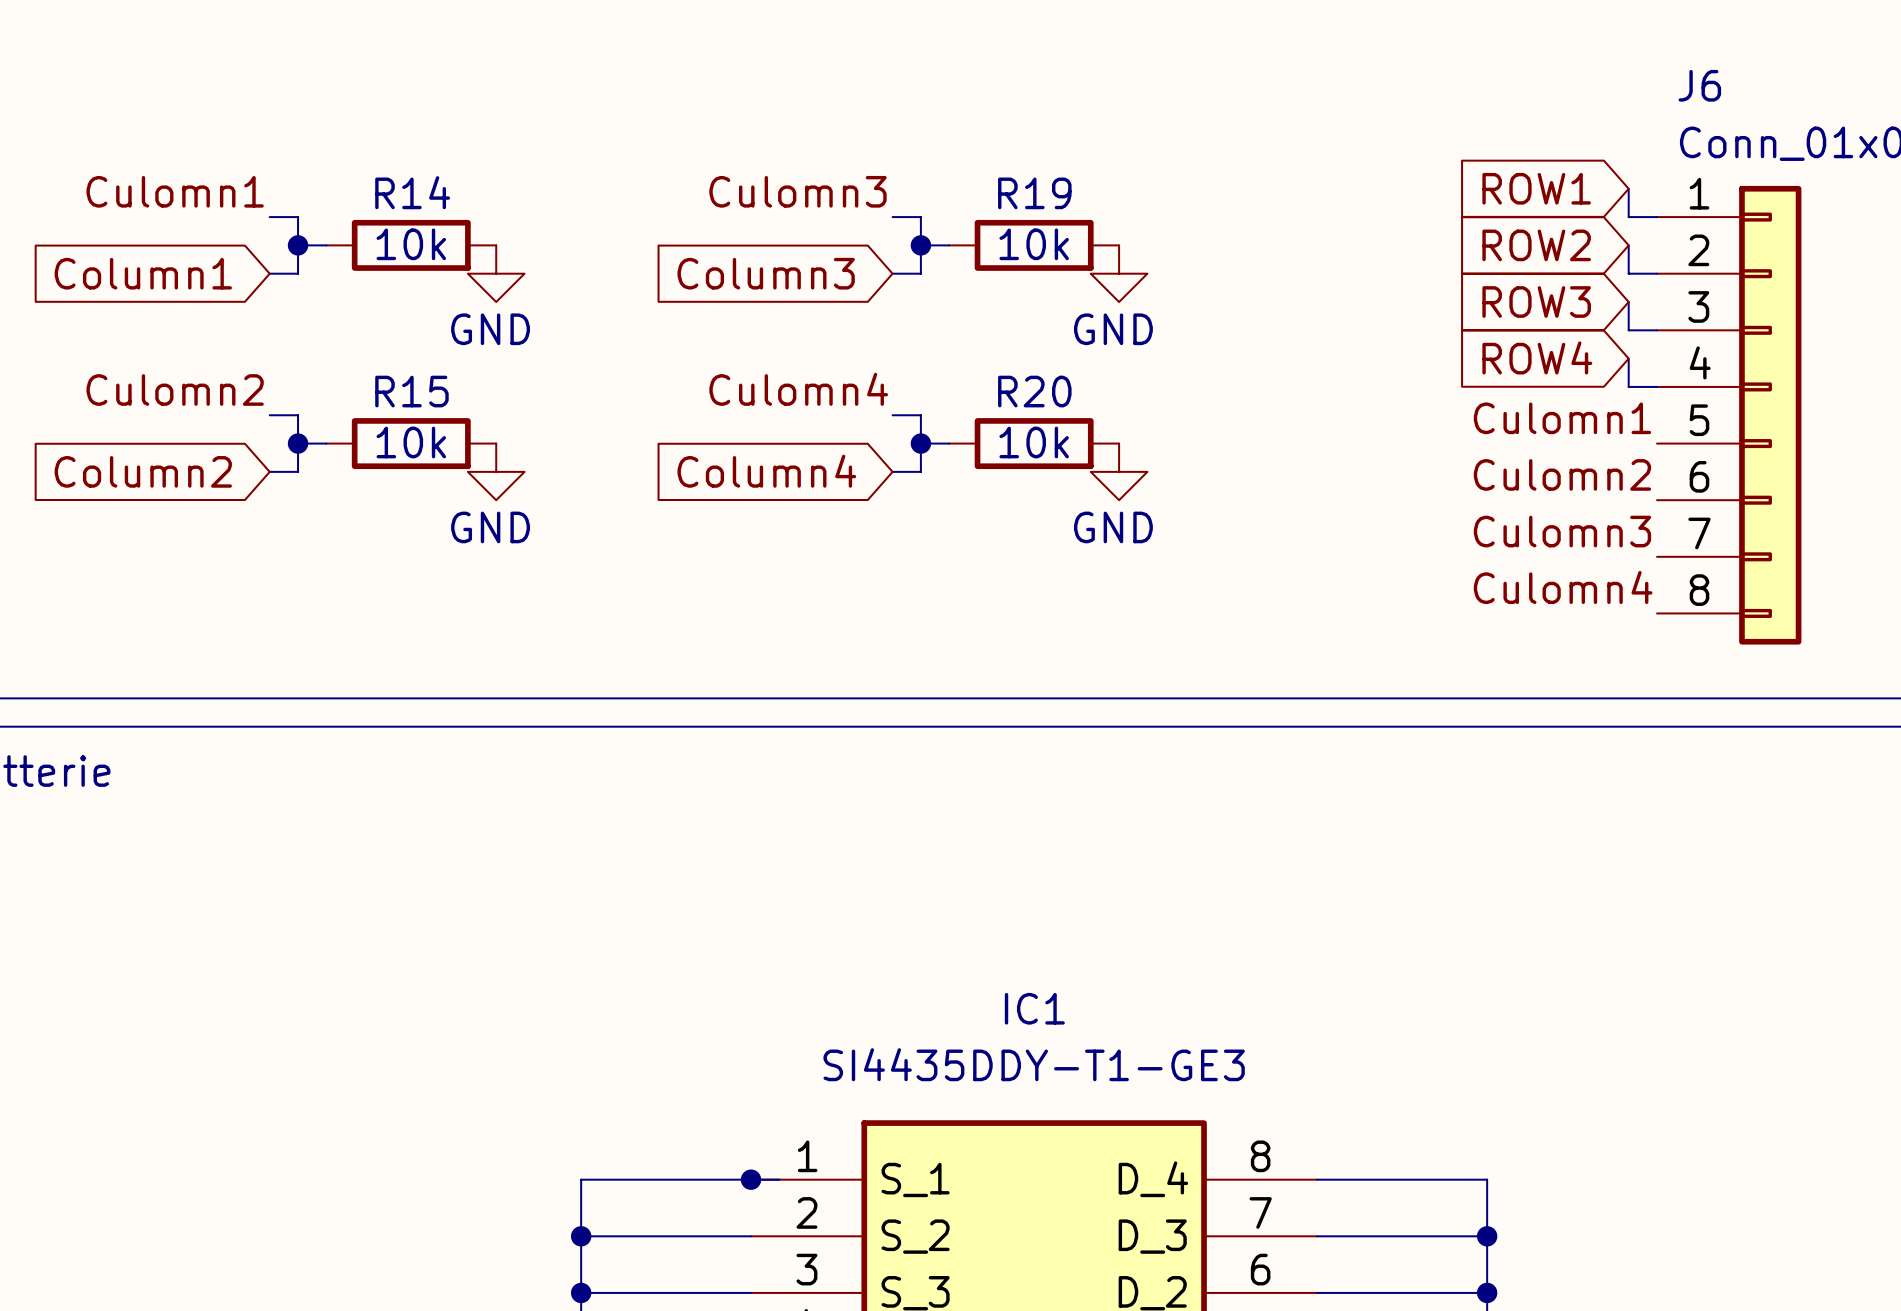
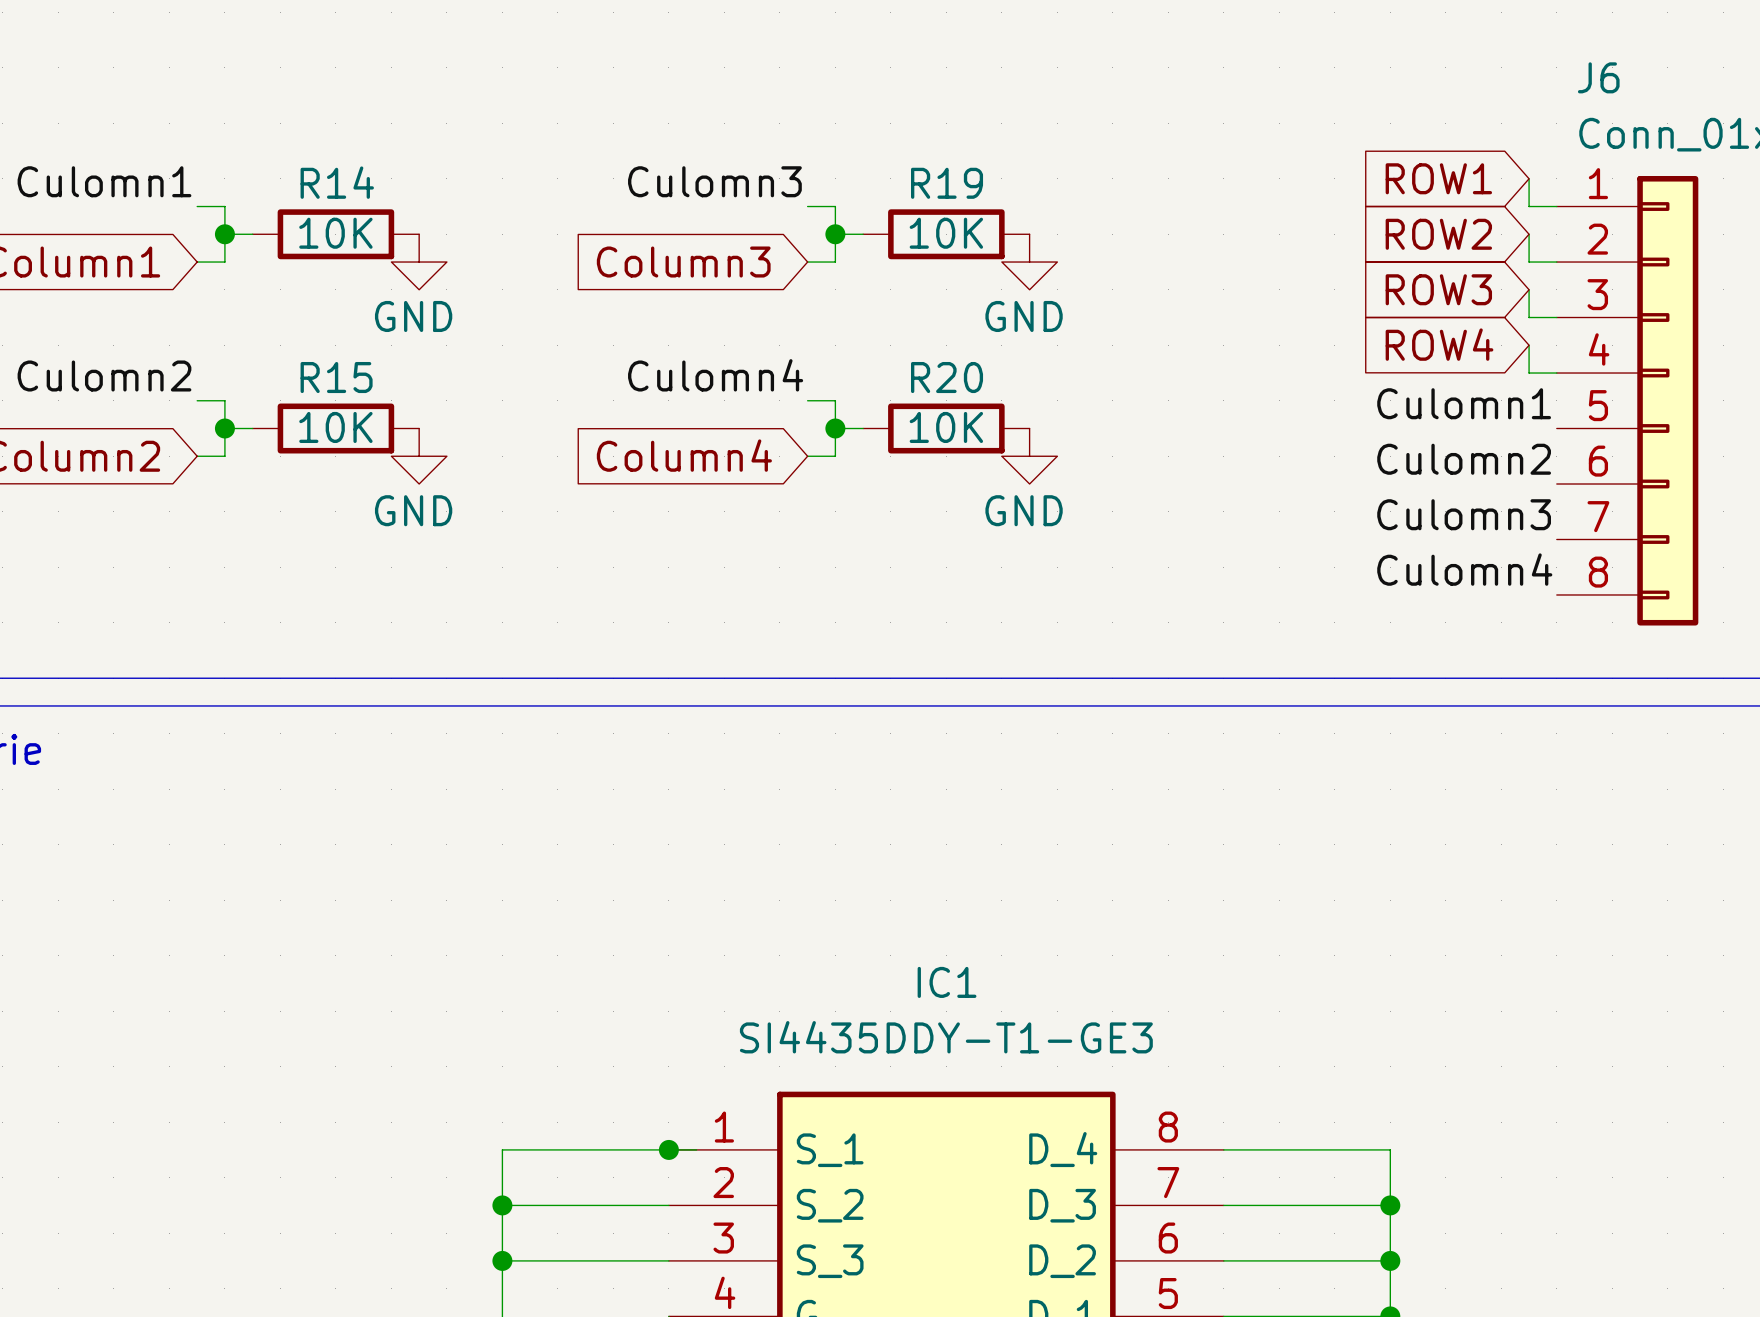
R14 value: 10k (411, 244) -> 10K (335, 233)
R19 value: 10k (1034, 244) -> 10K (946, 233)
R15 value: 10k (411, 442) -> 10K (335, 427)
R20 value: 10k (1034, 442) -> 10K (946, 427)

